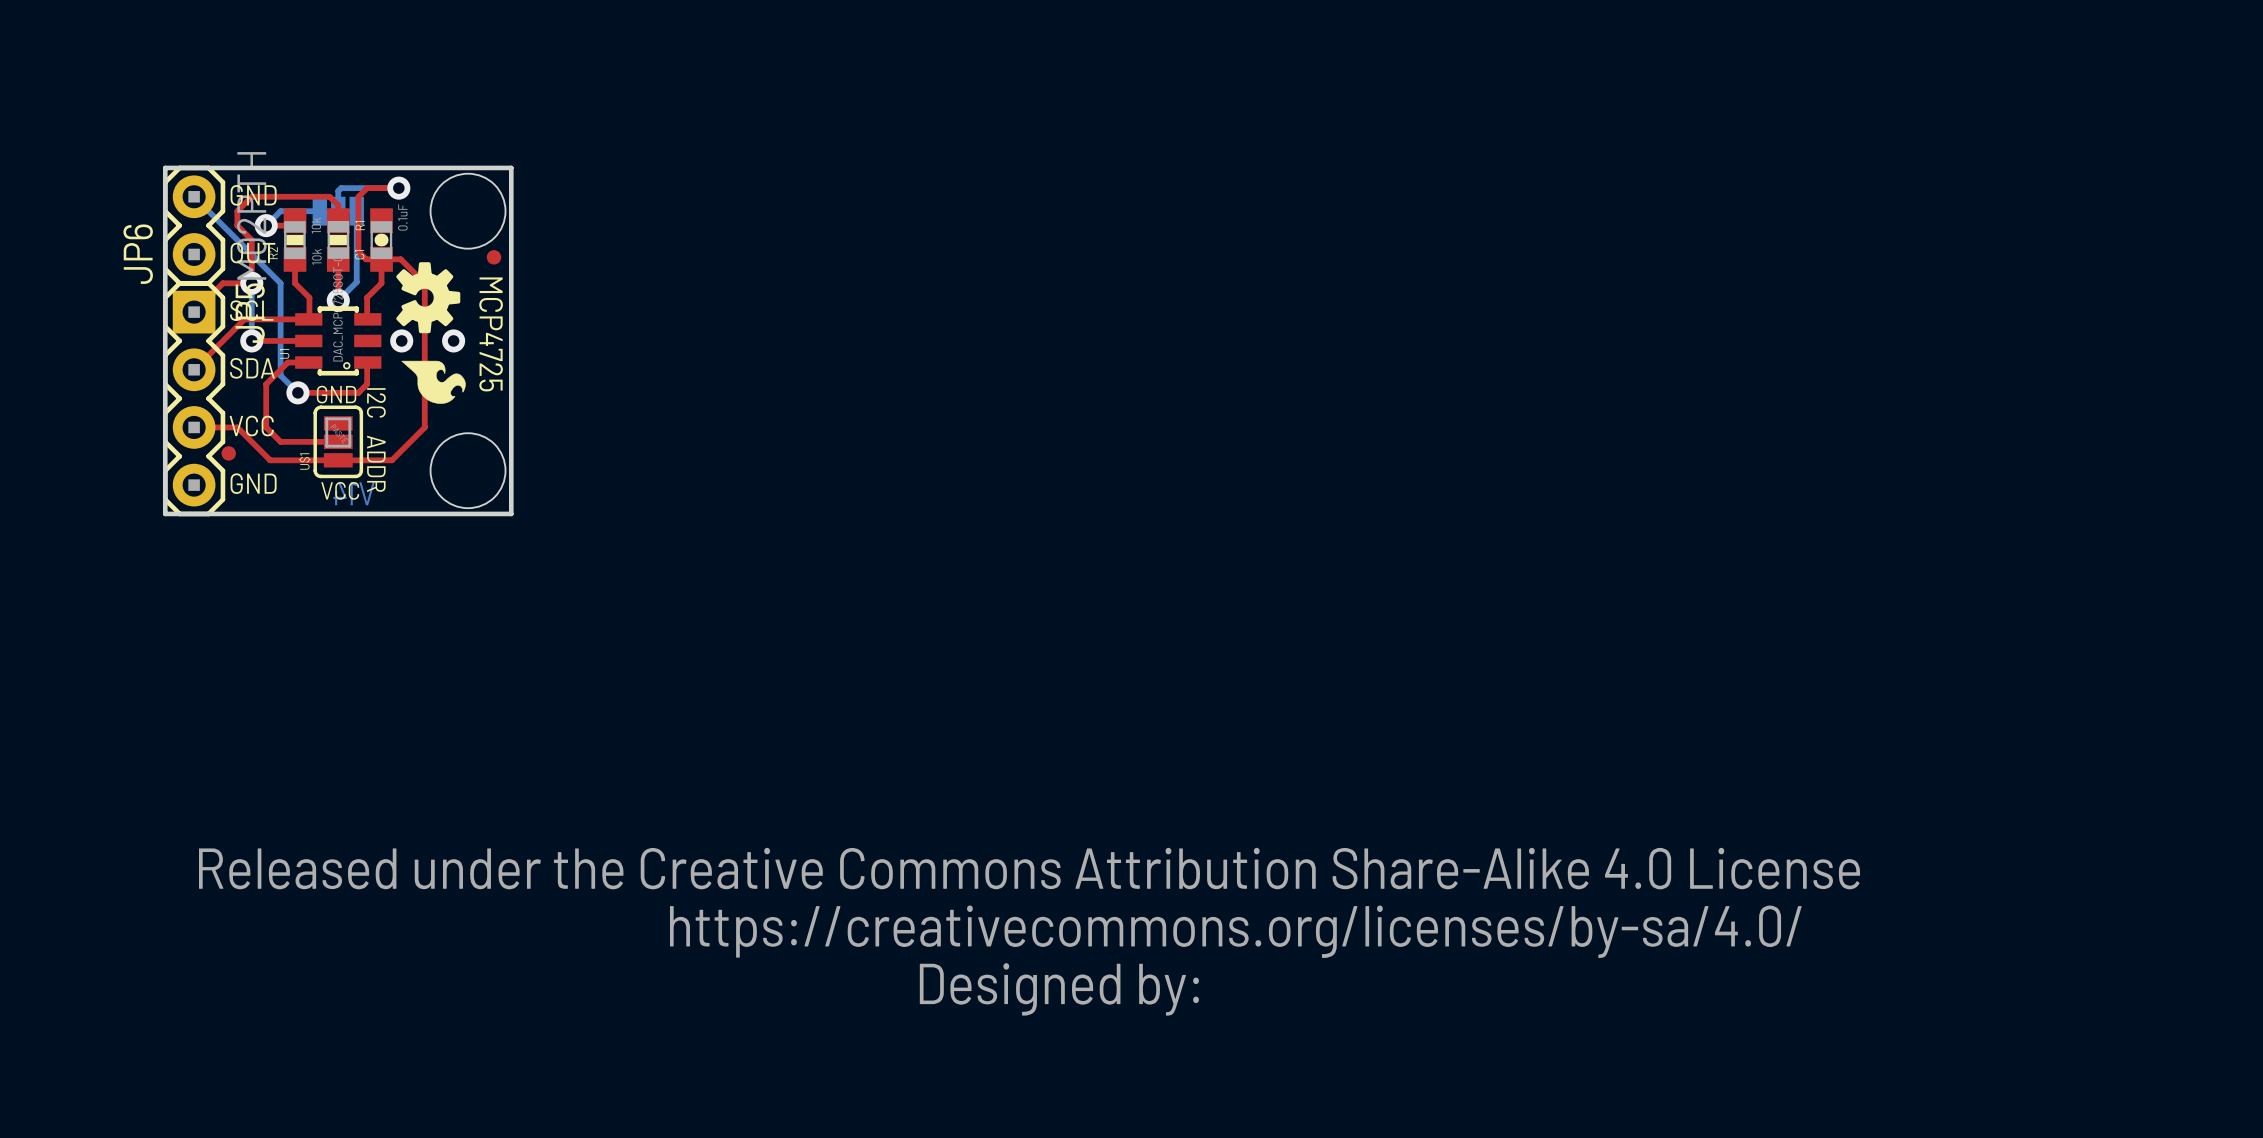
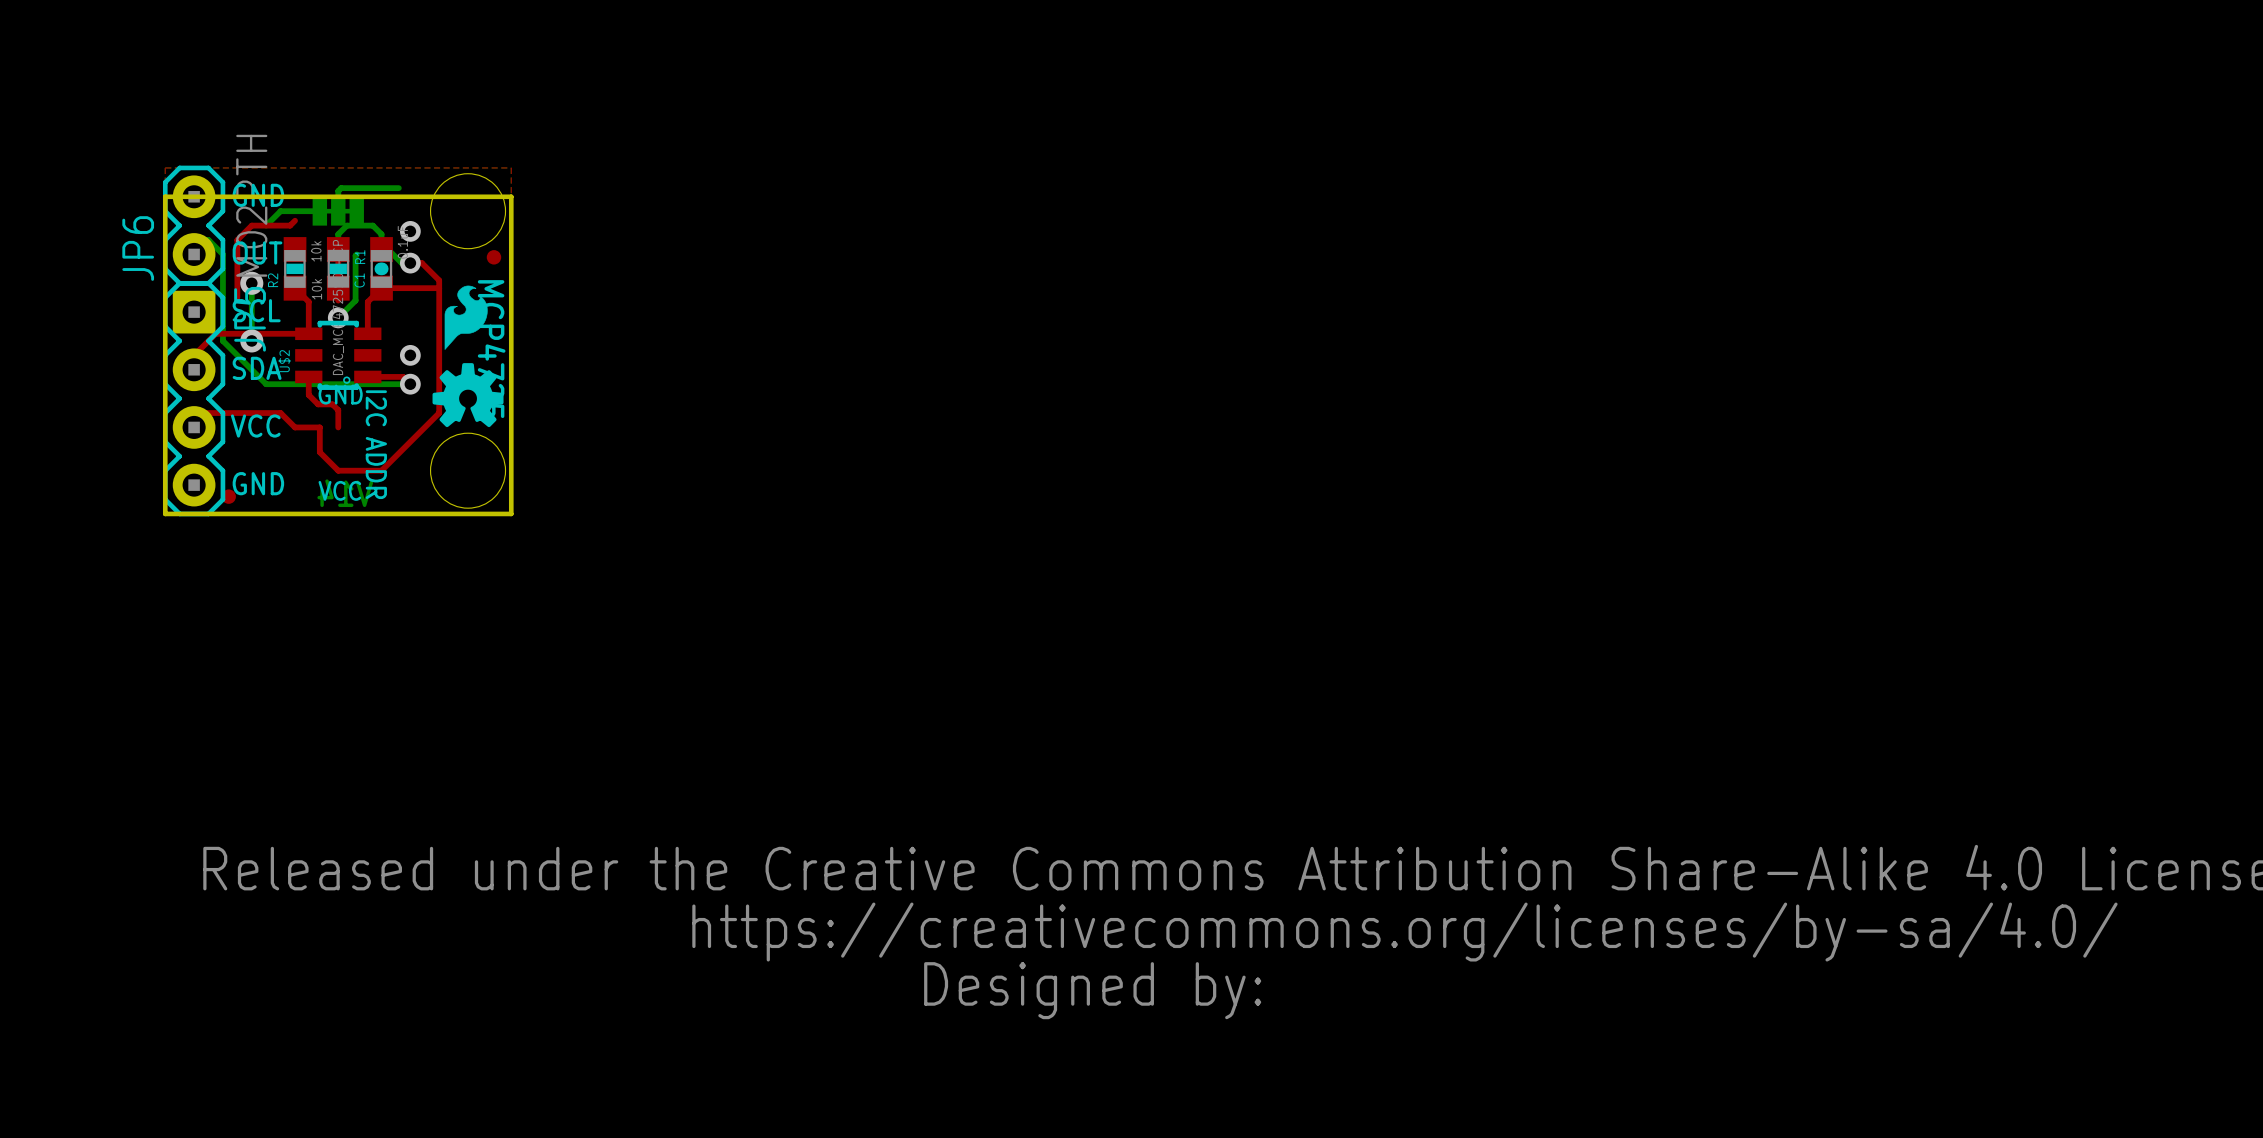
top track: (398, 188) (367, 188) (358, 196) (358, 251) (366, 259) (400, 259) (424, 283) (424, 427) -> (410, 263) (421, 263) (439, 280) (439, 413) (424, 427)
via: (398, 188) -> none
board edge: (165, 196) (165, 167) (511, 167) (511, 196) -> (165, 196) (511, 196)
bottom track: (194, 196) (280, 283) (280, 375) (297, 392) -> none
bottom track: (356, 211) (356, 282) (338, 300) -> none
top track: (338, 220) (338, 205) (329, 196) (251, 196) (237, 211) (237, 225) (251, 240) (251, 283) (222, 283) (194, 312) -> none
top track: none -> (266, 225) (251, 225) (237, 240) (237, 297)
via: (266, 225) -> none
via: none -> (410, 231)
bottom track: none -> (194, 240) (208, 240) (222, 254) (222, 340) (266, 384) (410, 384)
R2 position: (295, 240) -> (295, 268)
R1 position: (338, 240) -> (338, 268)
C1 position: (381, 240) -> (381, 268)
bottom track: none -> (338, 254) (338, 234) (346, 225) (372, 225) (381, 234) (381, 242) (401, 263) (410, 263)
bottom track: none -> (356, 254) (355, 300) (338, 317)
top track: (295, 259) (295, 283) (309, 297) (309, 318) (244, 319) (194, 369) -> none
top track: (381, 259) (381, 283) (367, 297) (367, 319) -> none
drawing: [396, 262, 461, 334] -> none
via: none -> (410, 263)
drawing: none -> [432, 285, 504, 428]
top track: none -> (295, 288) (308, 301) (308, 333) (215, 333) (194, 355)
top track: none -> (439, 288) (381, 288) (367, 301) (367, 333)
via position: (338, 300) -> (338, 317)
top track: (251, 340) (308, 340) -> none
U1 position: (338, 340) -> (338, 355)
via position: (401, 340) -> (410, 355)
via: (453, 340) -> none
U1 name: U1 (284, 353) -> U$2 (284, 361)
drawing: [401, 360, 466, 404] -> none
top track: (308, 362) (287, 362) (266, 384) (266, 427) (280, 441) (338, 441) -> none
top track: (367, 362) (367, 384) (358, 392) (297, 392) -> none
top track: none -> (308, 376) (308, 395) (318, 404) (332, 404) (338, 410) (338, 427)
top track: none -> (367, 376) (403, 376) (410, 384)
via: none -> (410, 384)
via: (297, 392) -> none
top track: (194, 427) (237, 427) (270, 460) (391, 460) -> (194, 413) (280, 413) (295, 427) (319, 427) (319, 452) (338, 470) (381, 470) (391, 460)
U$1: (338, 441) -> none
part position: (228, 453) -> (228, 496)

